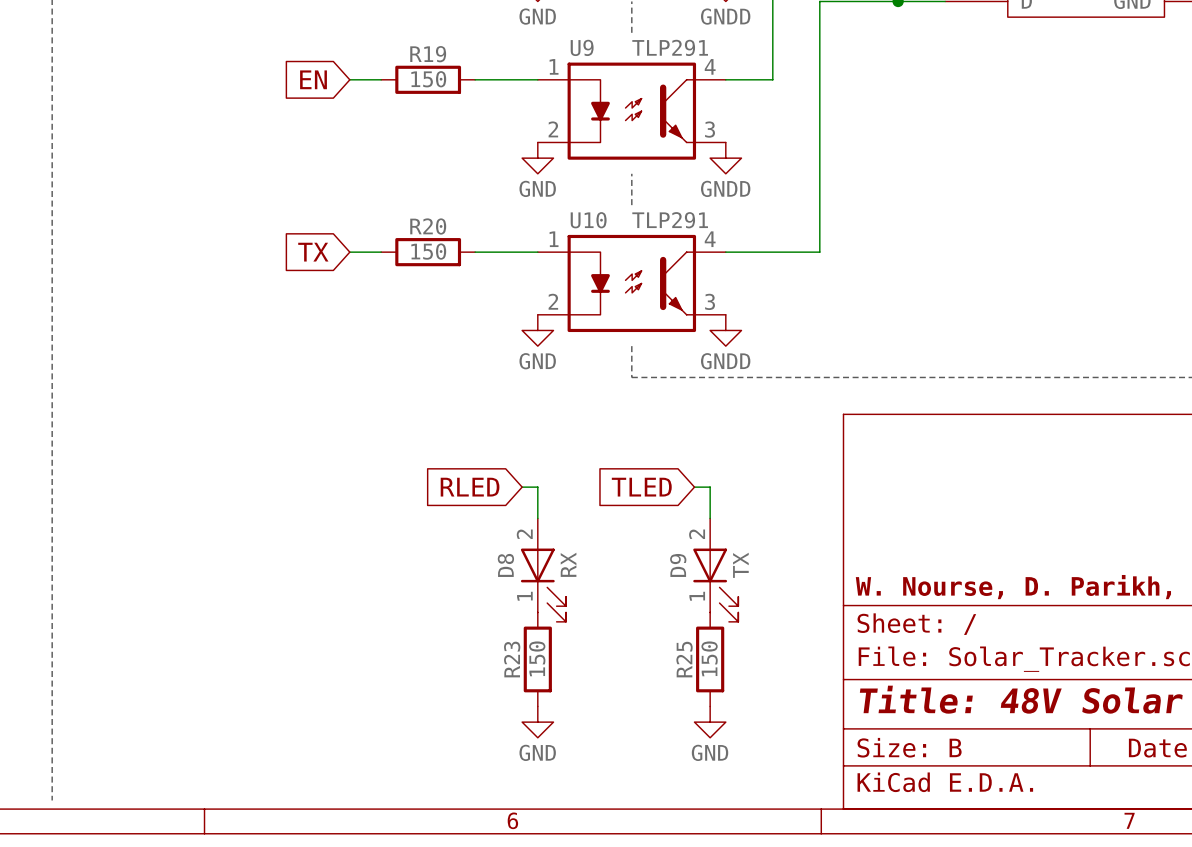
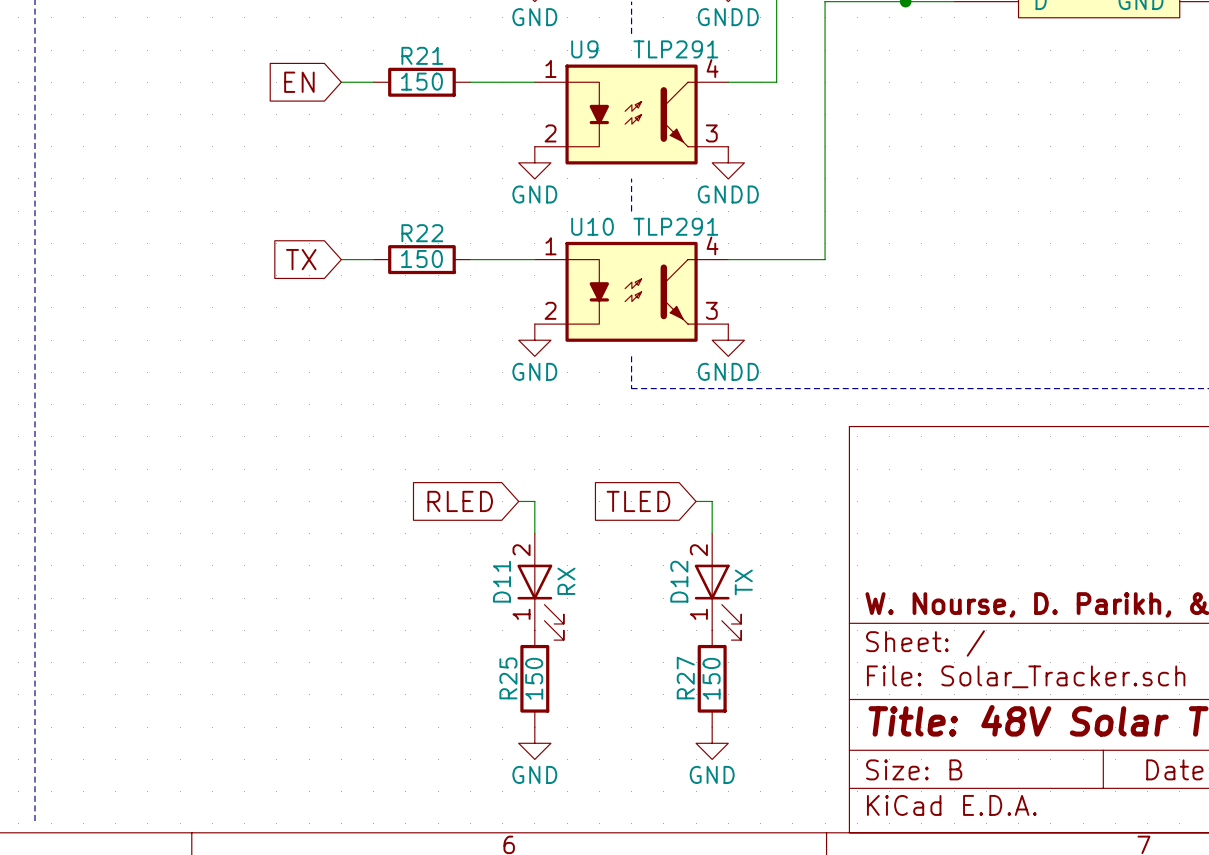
R19 name: R19 (428, 54) -> R21 (422, 55)
R20 name: R20 (428, 226) -> R22 (422, 233)
D8 name: D8 (505, 565) -> D11 (501, 581)
D9 name: D9 (678, 565) -> D12 (679, 581)
R23 name: R23 (512, 659) -> R25 (508, 678)
R25 name: R25 (684, 659) -> R27 (685, 678)

